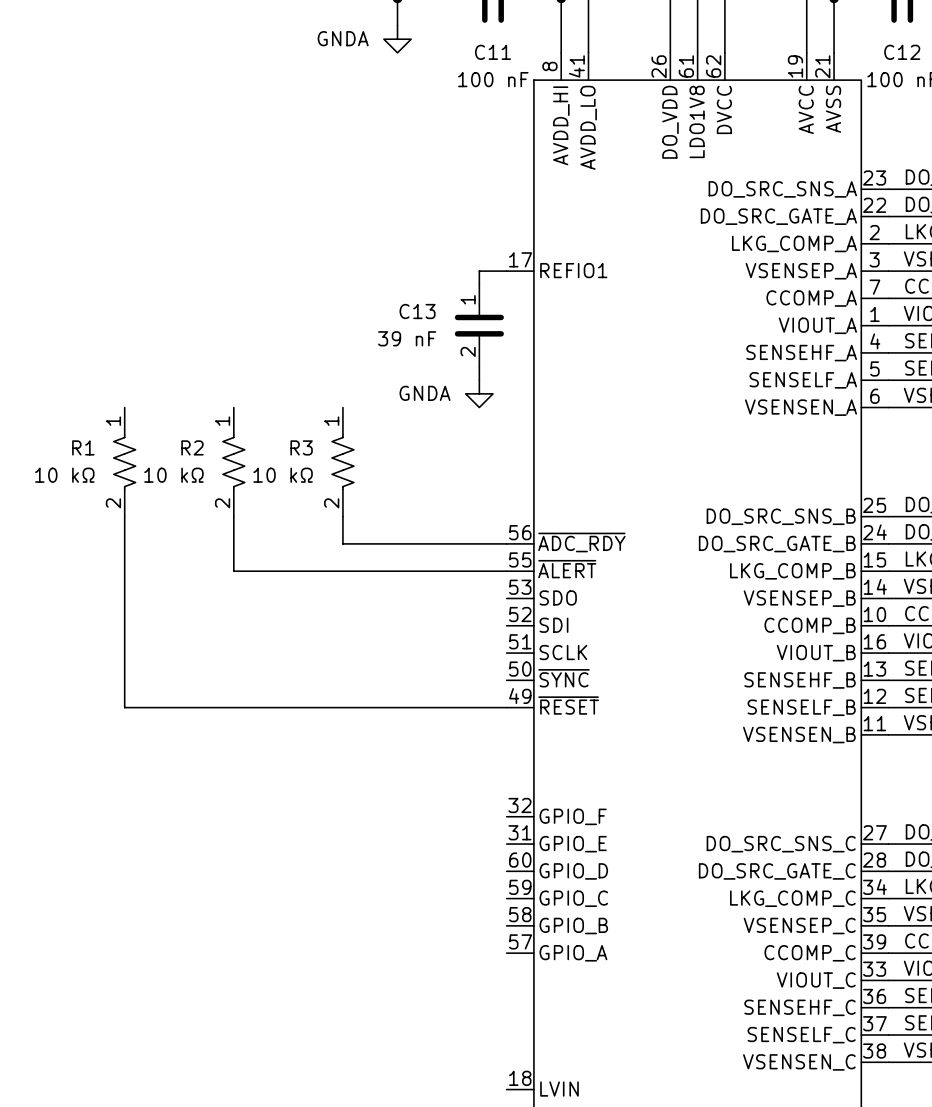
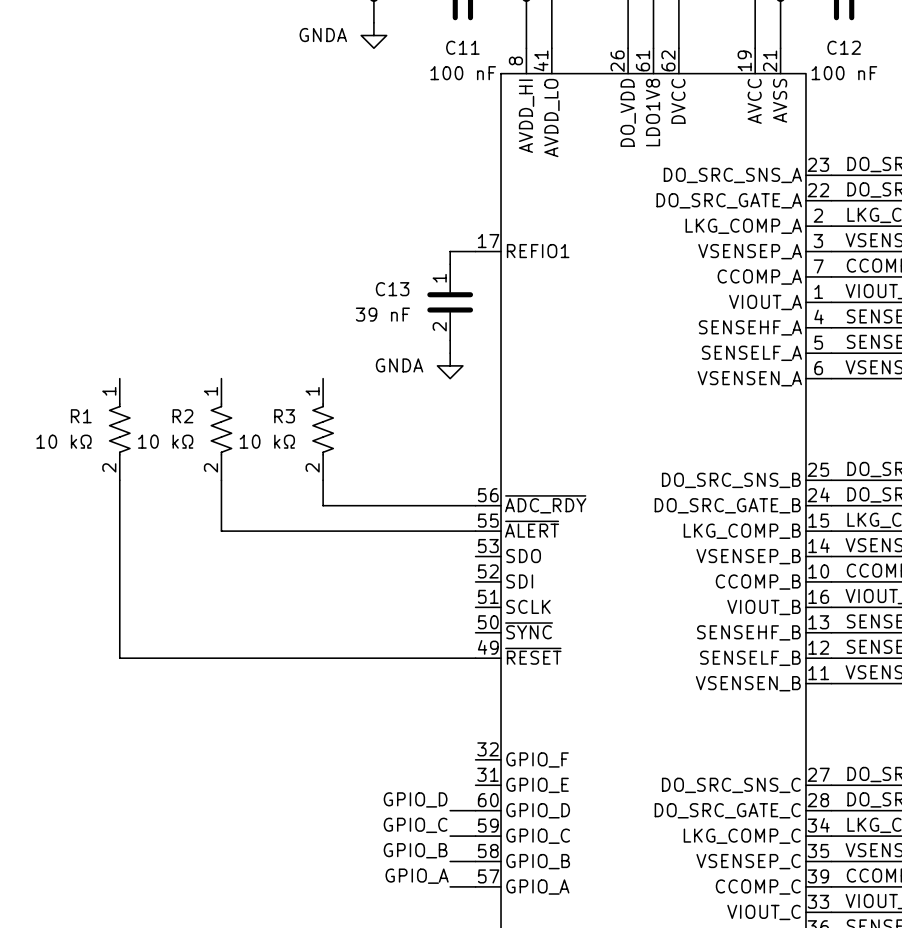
label: none -> GPIO_D (415, 799)
wire: none -> (450, 810) (475, 810)
label: none -> GPIO_C (415, 825)
wire: none -> (450, 836) (475, 836)
label: none -> GPIO_B (415, 850)
wire: none -> (450, 861) (475, 861)
label: none -> GPIO_A (417, 876)
wire: none -> (450, 886) (475, 886)

